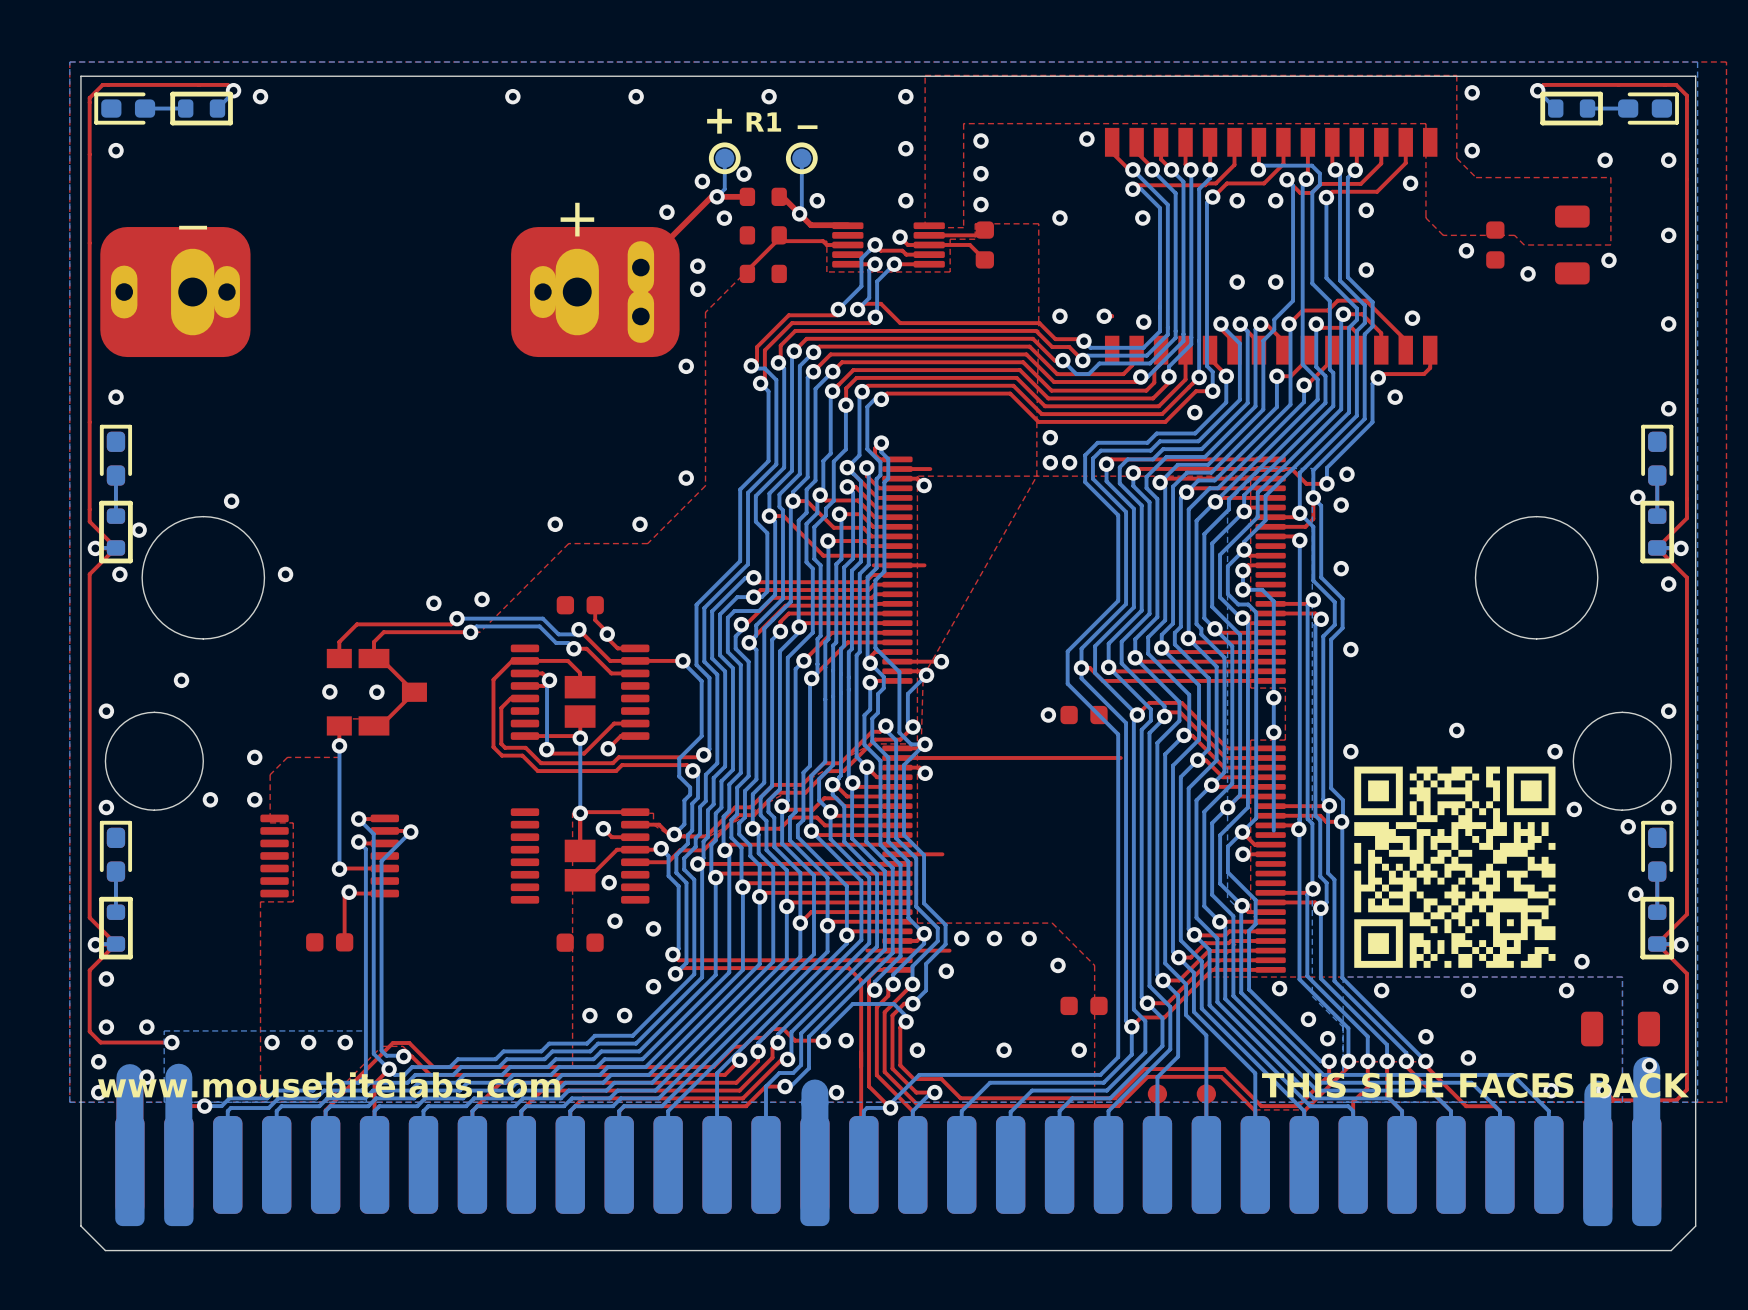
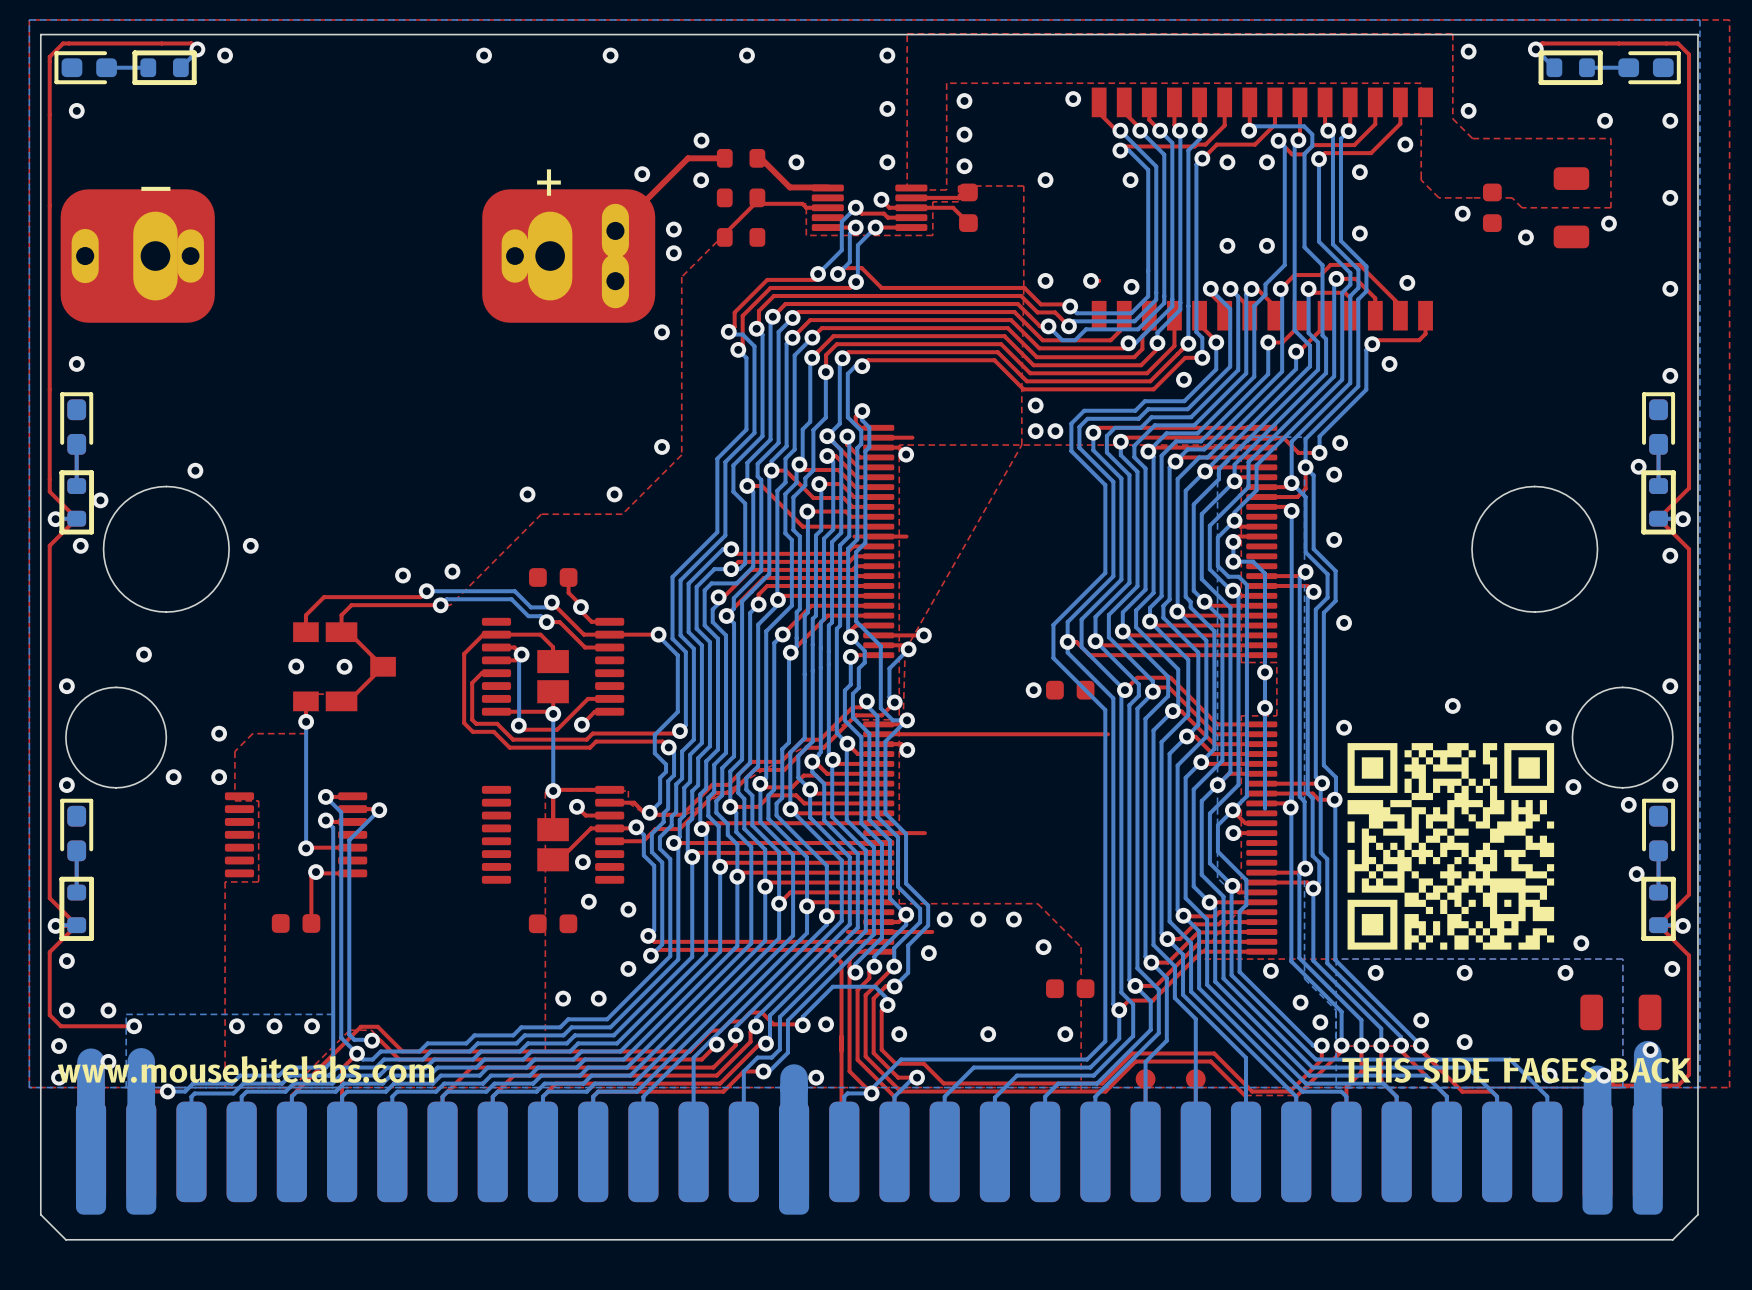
text: + (719, 121) -> none
text: R1 (763, 122) -> none
text: _ (807, 127) -> none
bottom track: (724, 158) (724, 189) (717, 196) -> none
part: (724, 158) -> none
bottom track: (801, 158) (801, 211) (799, 213) -> none
part: (801, 158) -> none
via: (743, 174) -> none
via: none -> (701, 140)
via: (702, 181) -> none
via: (717, 196) -> none
via: (799, 213) -> none

